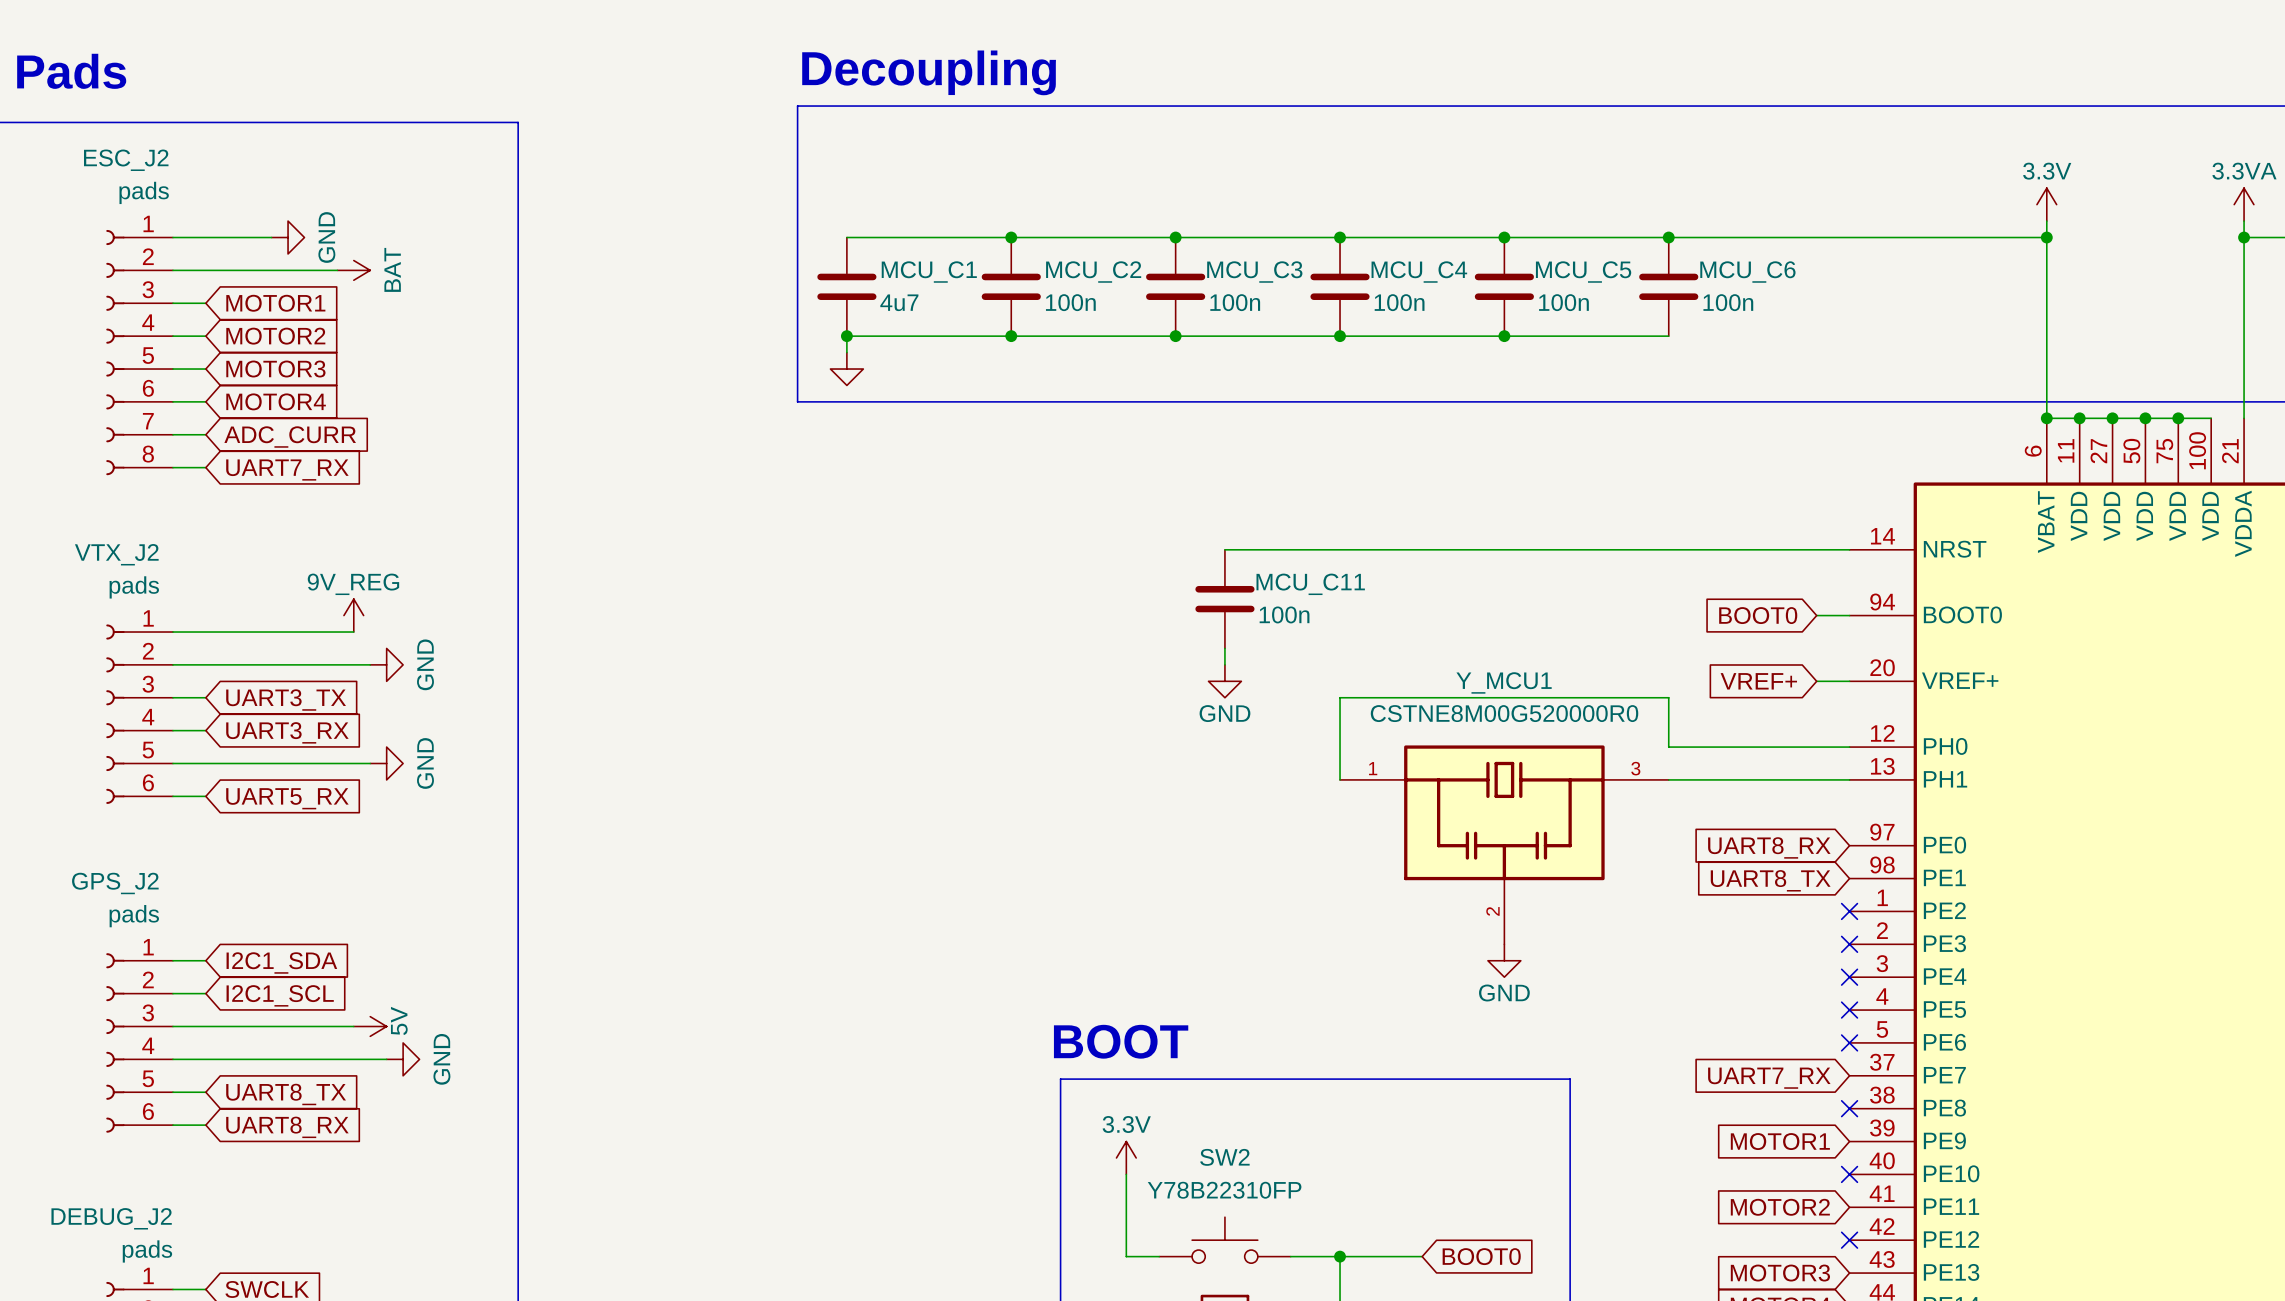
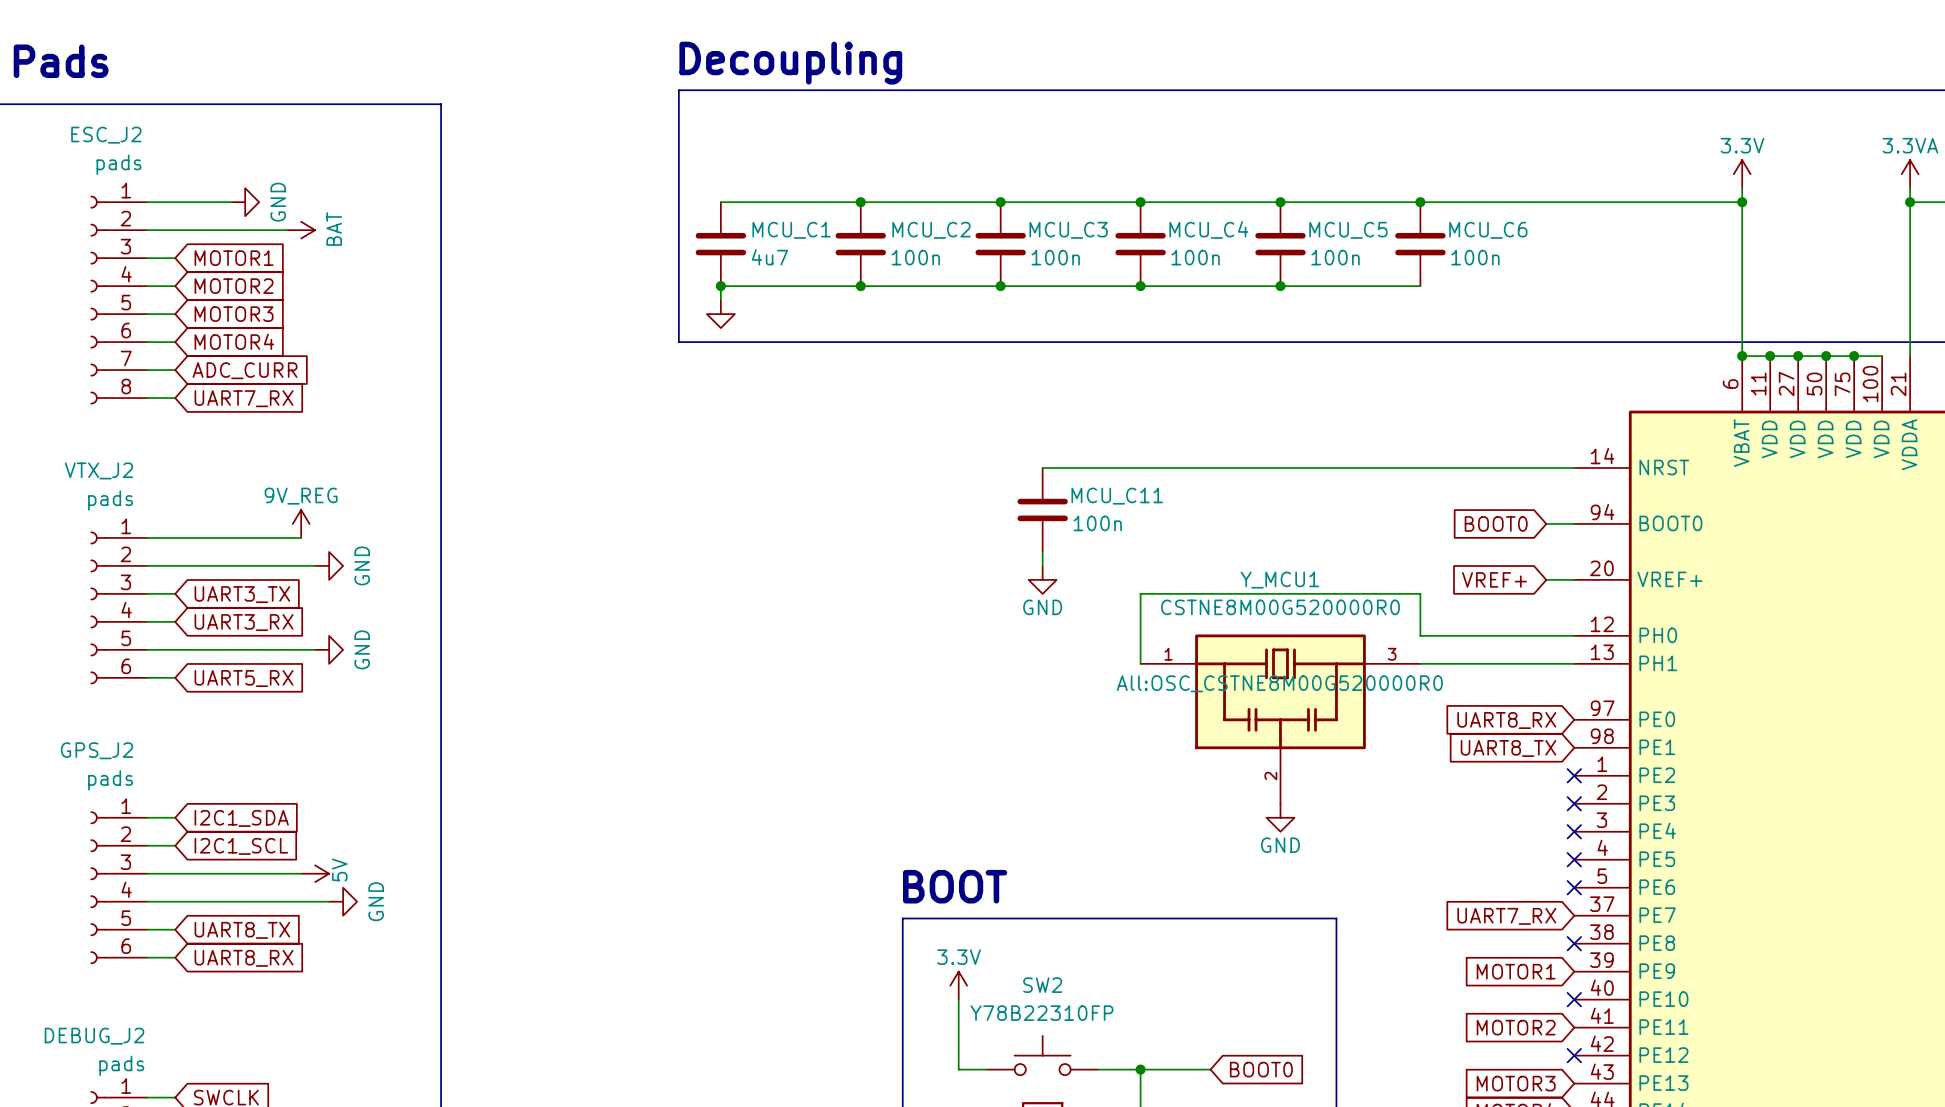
Y_MCU1 text: none -> All:OSC_CSTNE8M00G520000R0 (1279, 683)

